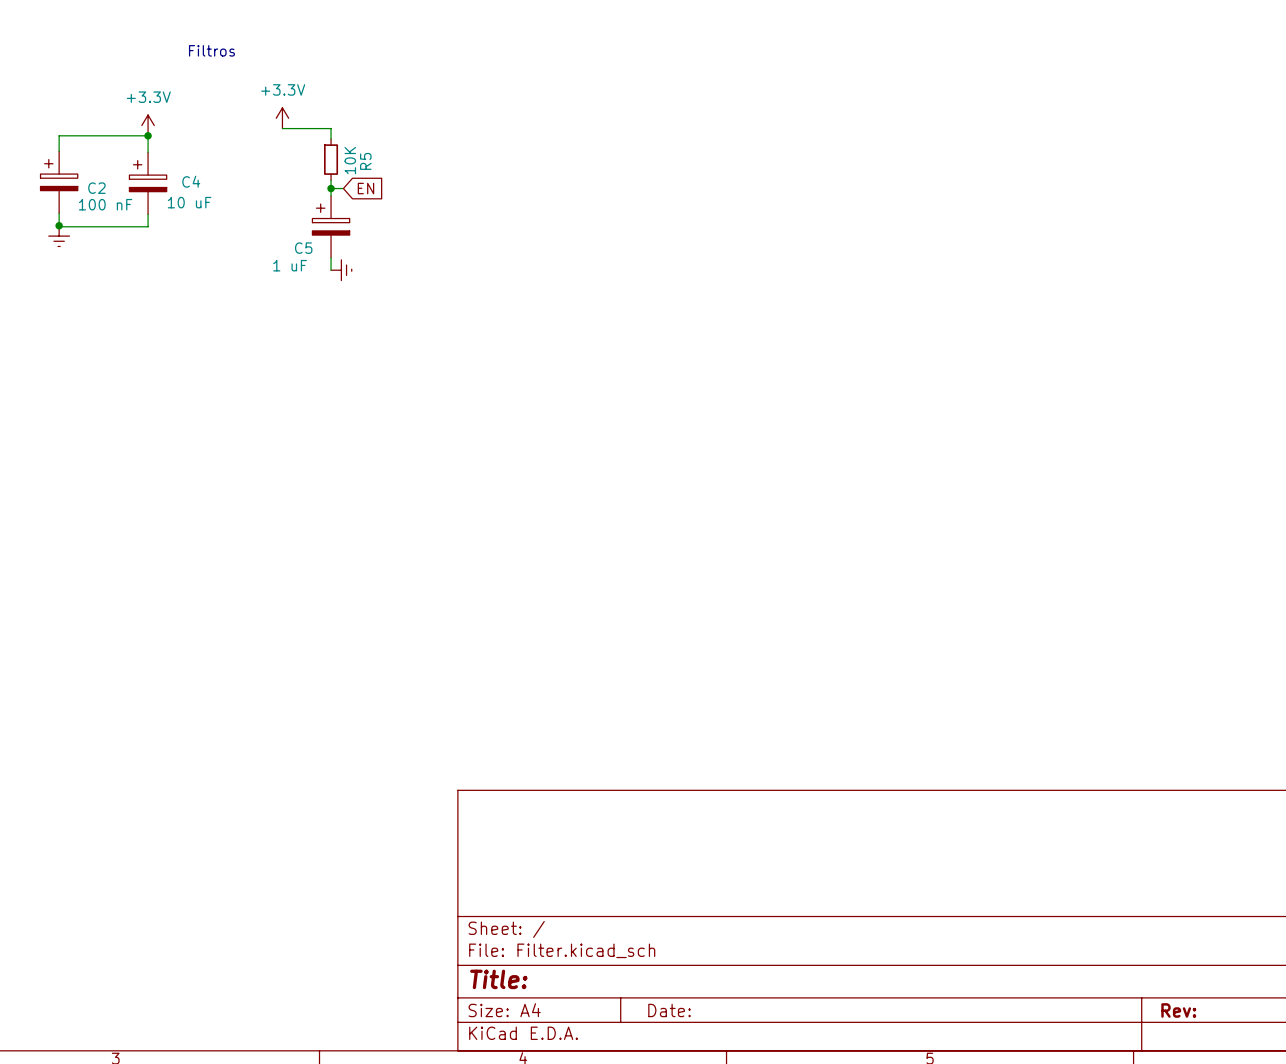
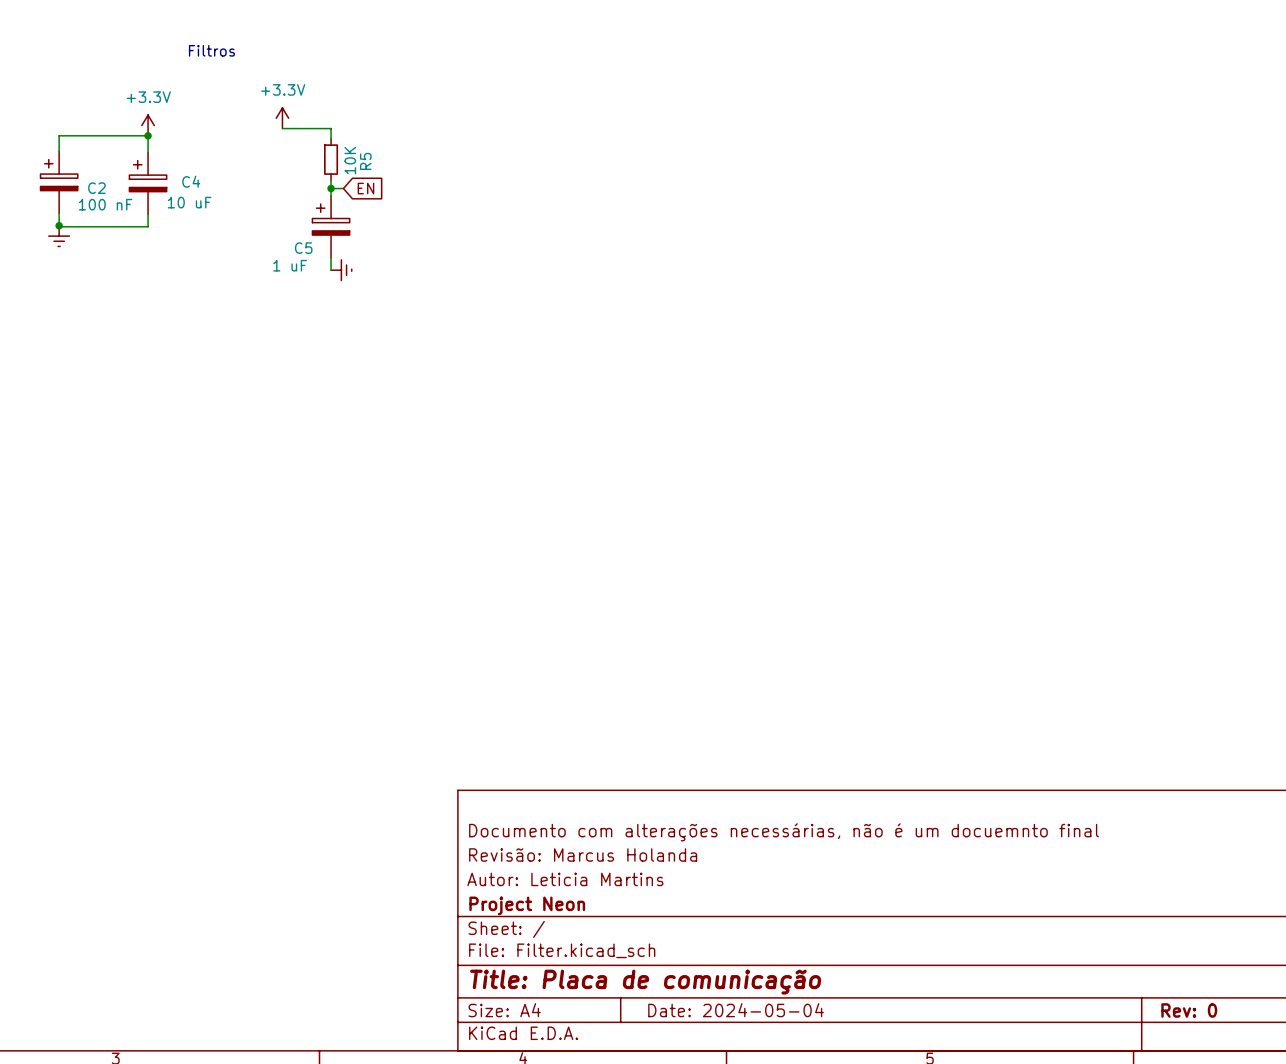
title block: none -> Documento com alterações necessárias, não é um docuemnto final (784, 832)
title block: none -> Revisão: Marcus Holanda (583, 855)
title block: none -> Autor: Leticia Martins (565, 879)
title block: none -> Project Neon (527, 905)
title block: Title: (498, 979) -> Title: Placa de comunicação (645, 982)
title block: Date: (669, 1010) -> Date: 2024-05-04 (736, 1010)
title block: Rev: (1178, 1010) -> Rev: 0 (1189, 1010)

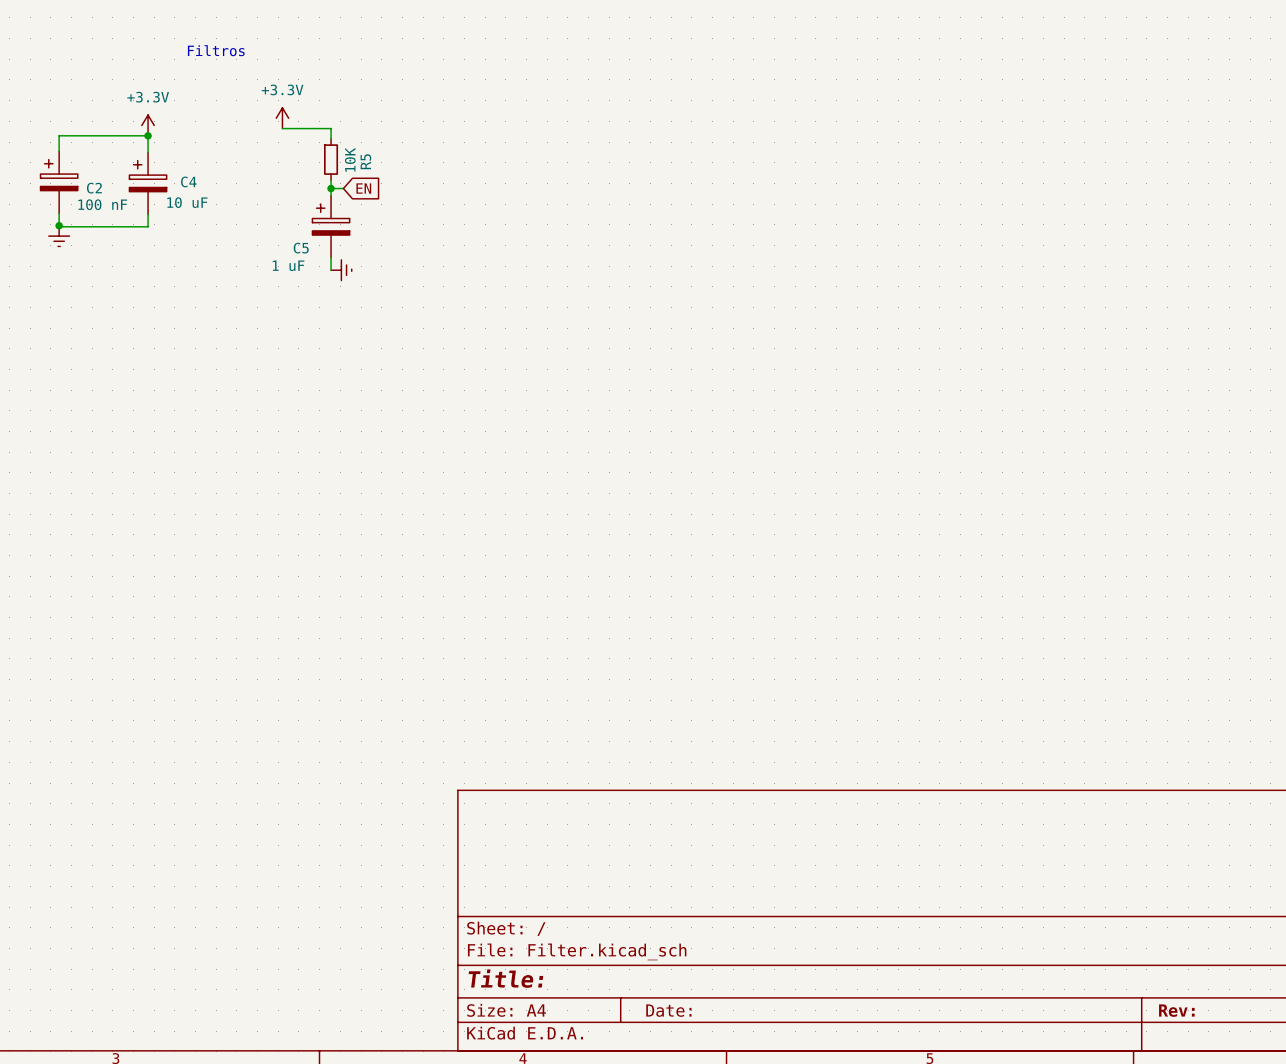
title block: Documento com alterações necessárias, não é um docuemnto final (784, 832) -> none
title block: Revisão: Marcus Holanda (583, 855) -> none
title block: Autor: Leticia Martins (565, 879) -> none
title block: Project Neon (527, 905) -> none
title block: Title: Placa de comunicação (645, 982) -> Title: (505, 978)
title block: Date: 2024-05-04 (736, 1010) -> Date: (668, 1010)
title block: Rev: 0 (1189, 1010) -> Rev: (1176, 1010)

